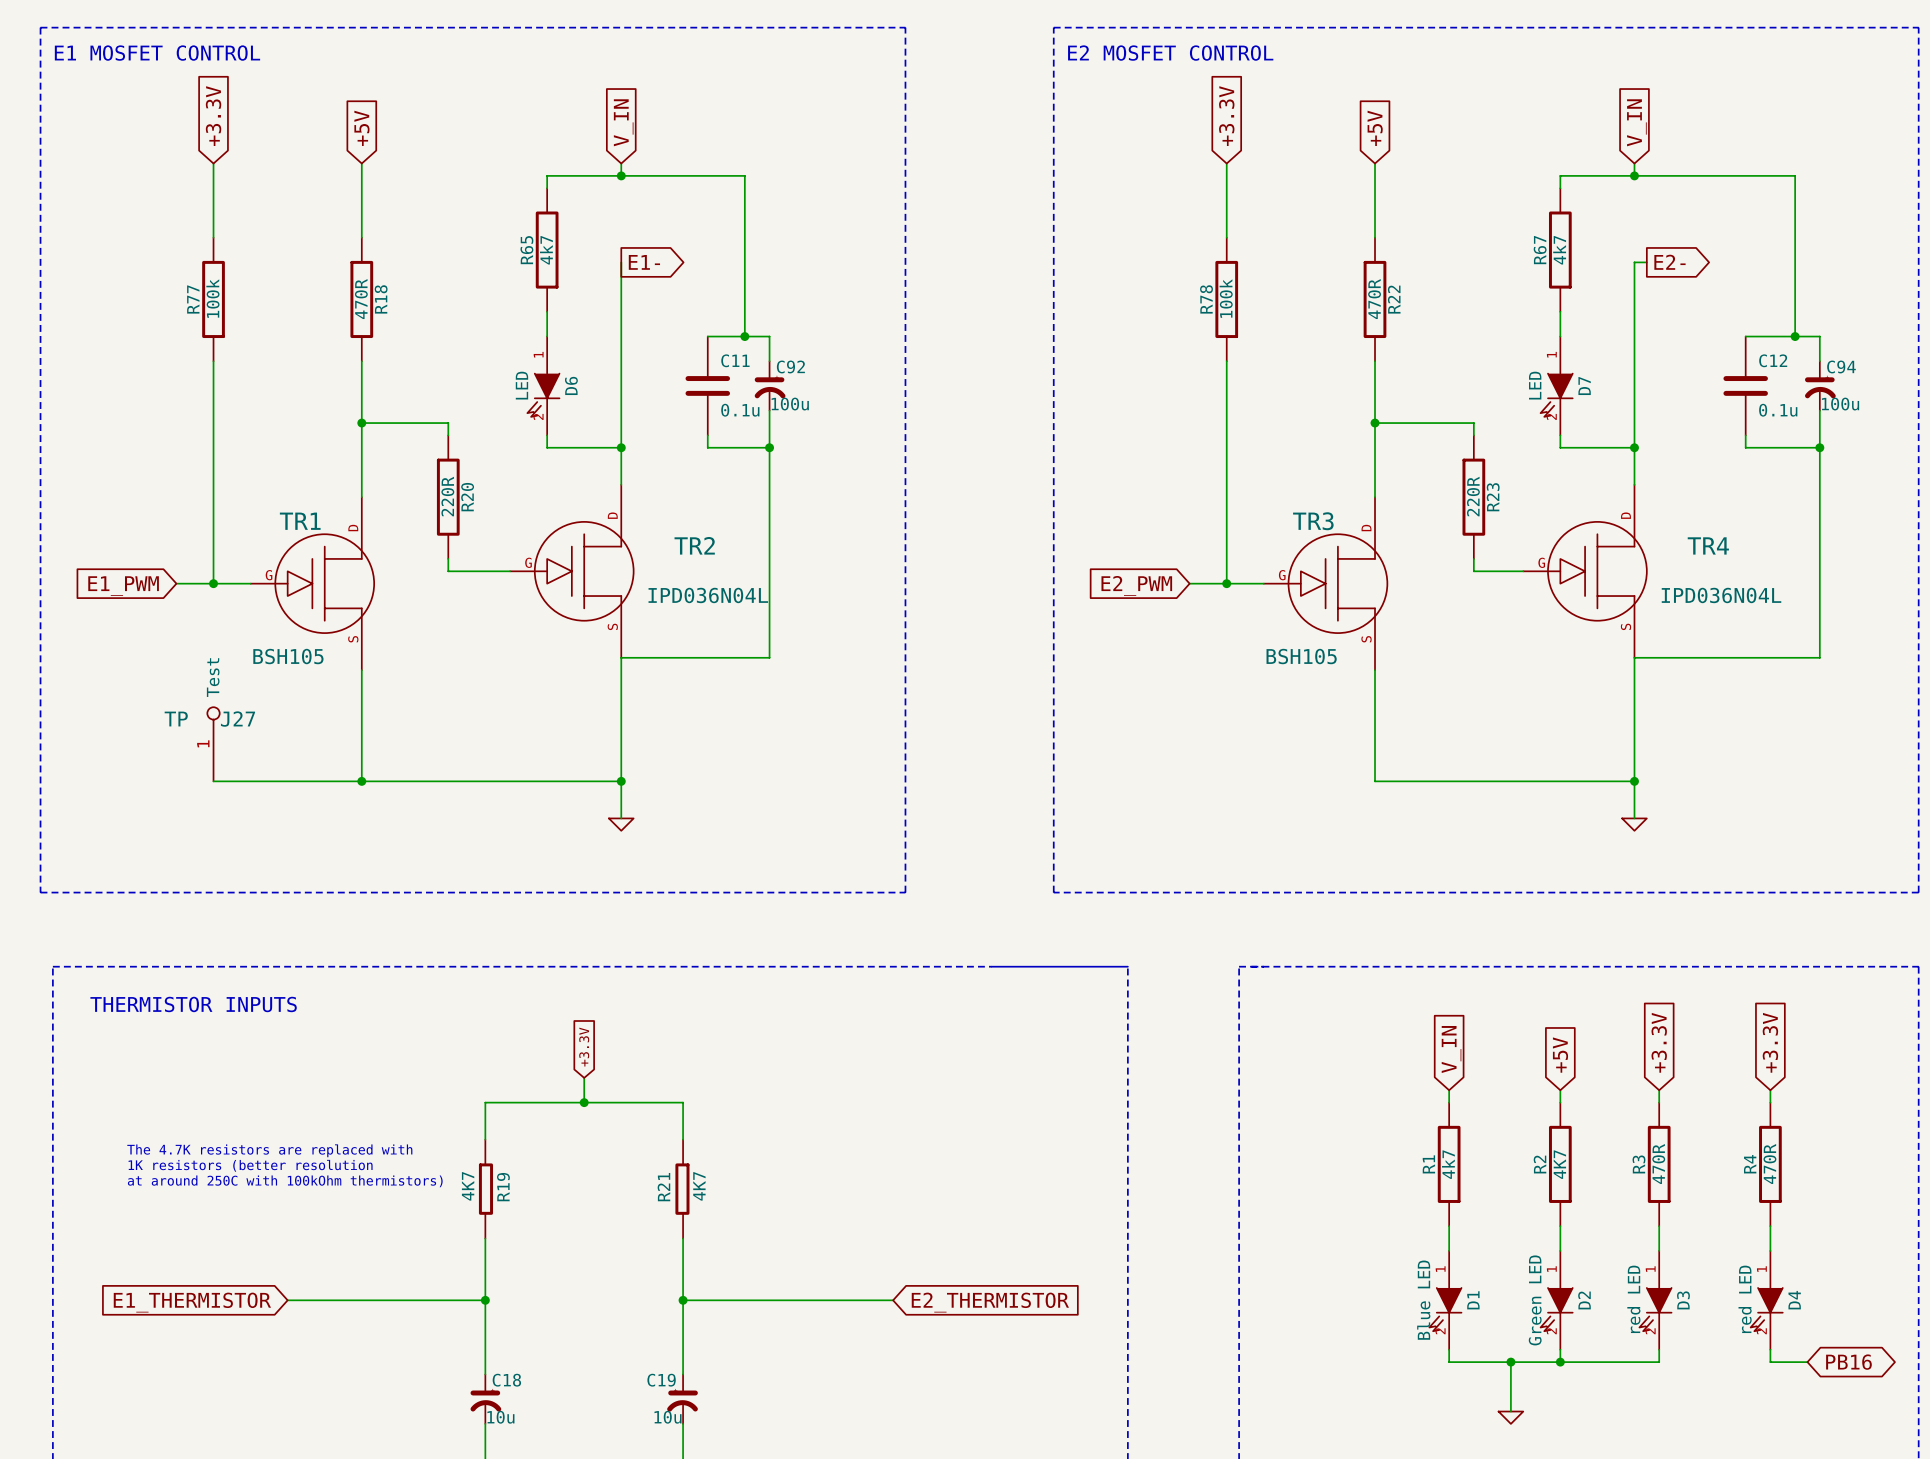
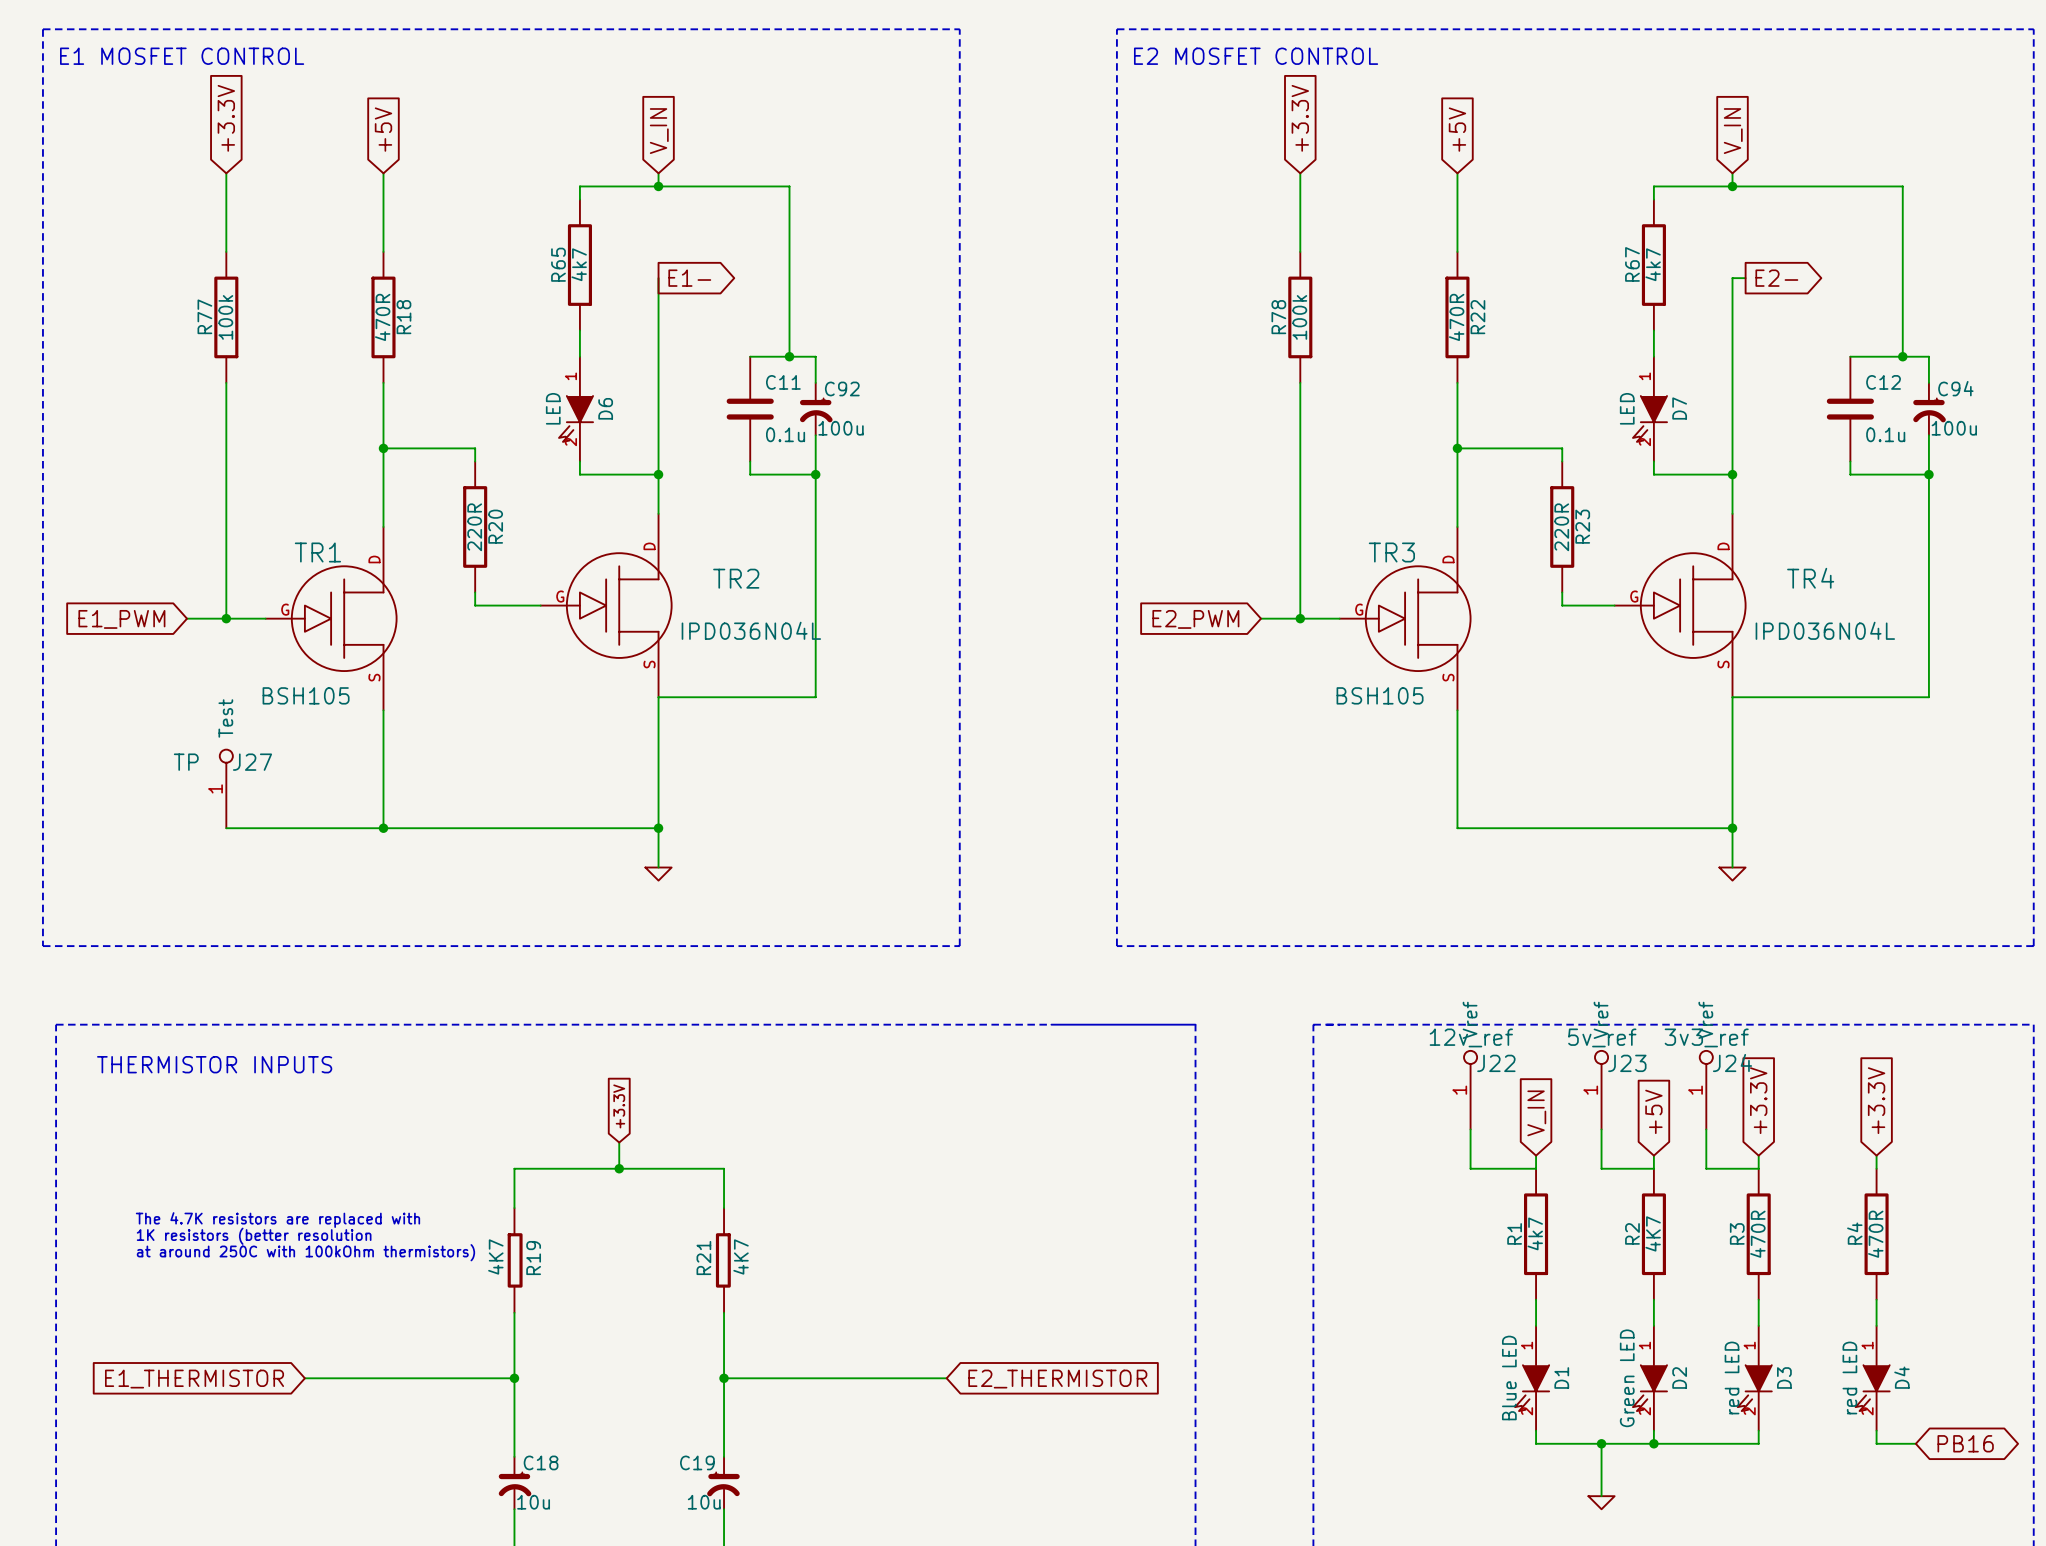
J22: none -> 12v_ref (1470, 1090)
J23: none -> 5v_ref (1601, 1090)
J24: none -> 3v3_ref (1706, 1090)
wire: none -> (1470, 1129) (1470, 1168) (1536, 1168)
wire: none -> (1601, 1129) (1601, 1168) (1653, 1168)
wire: none -> (1706, 1129) (1706, 1168) (1758, 1168)

